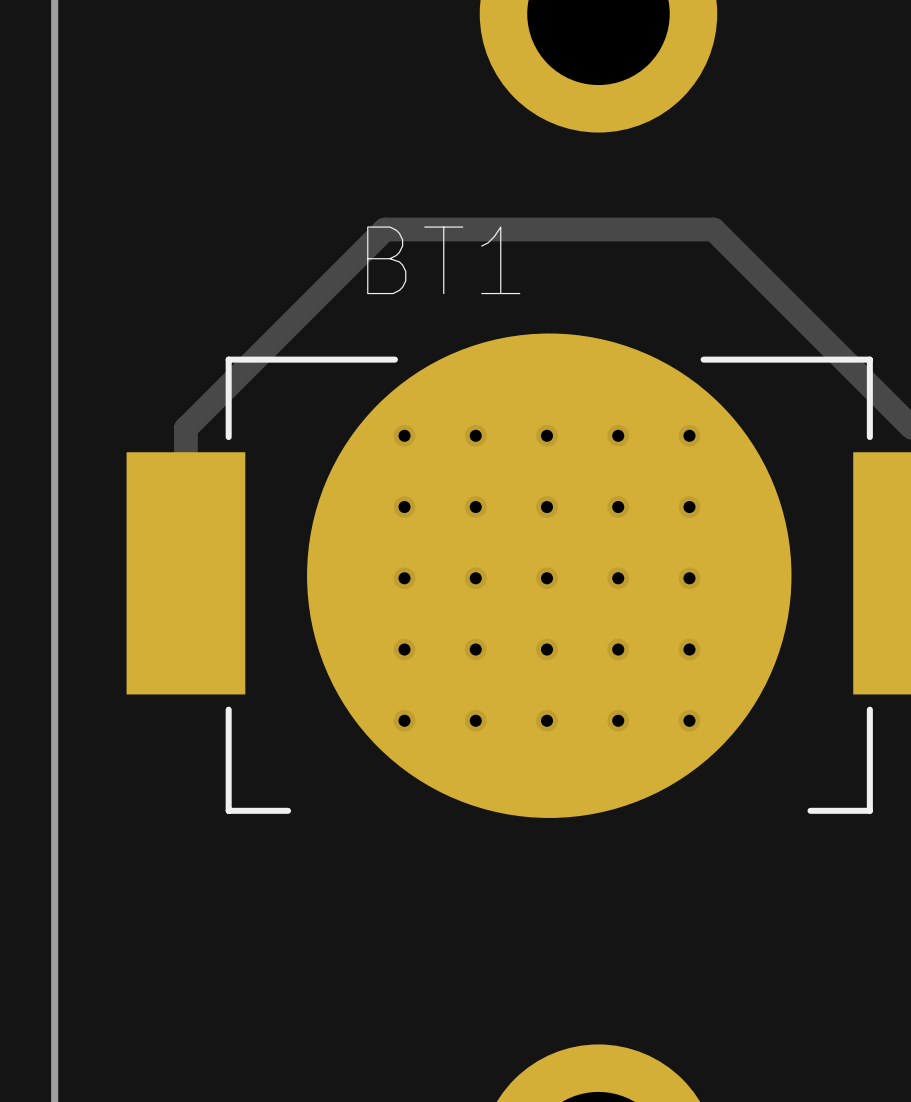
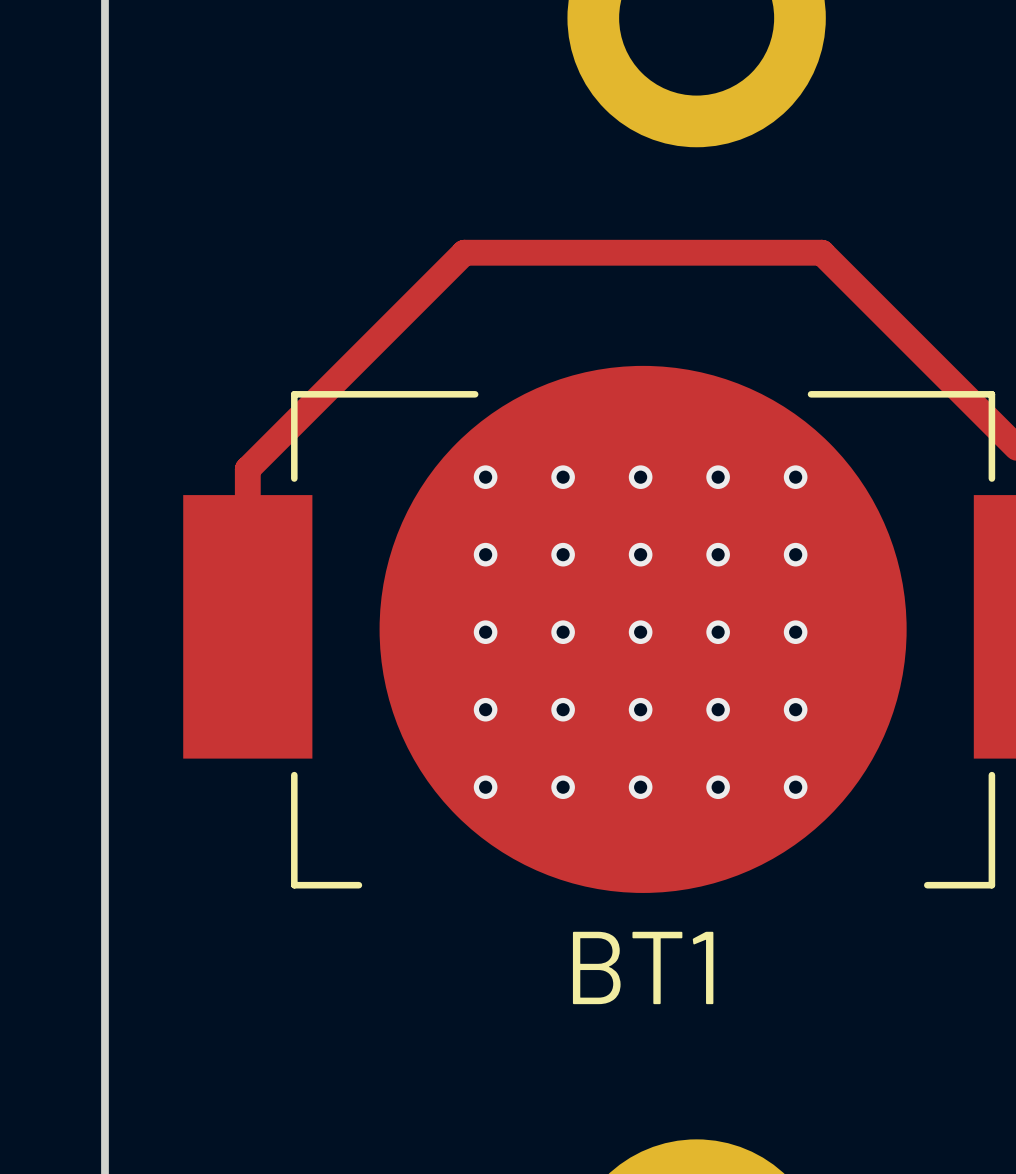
BT1 name position: BT1 (443, 260) -> BT1 (643, 967)

